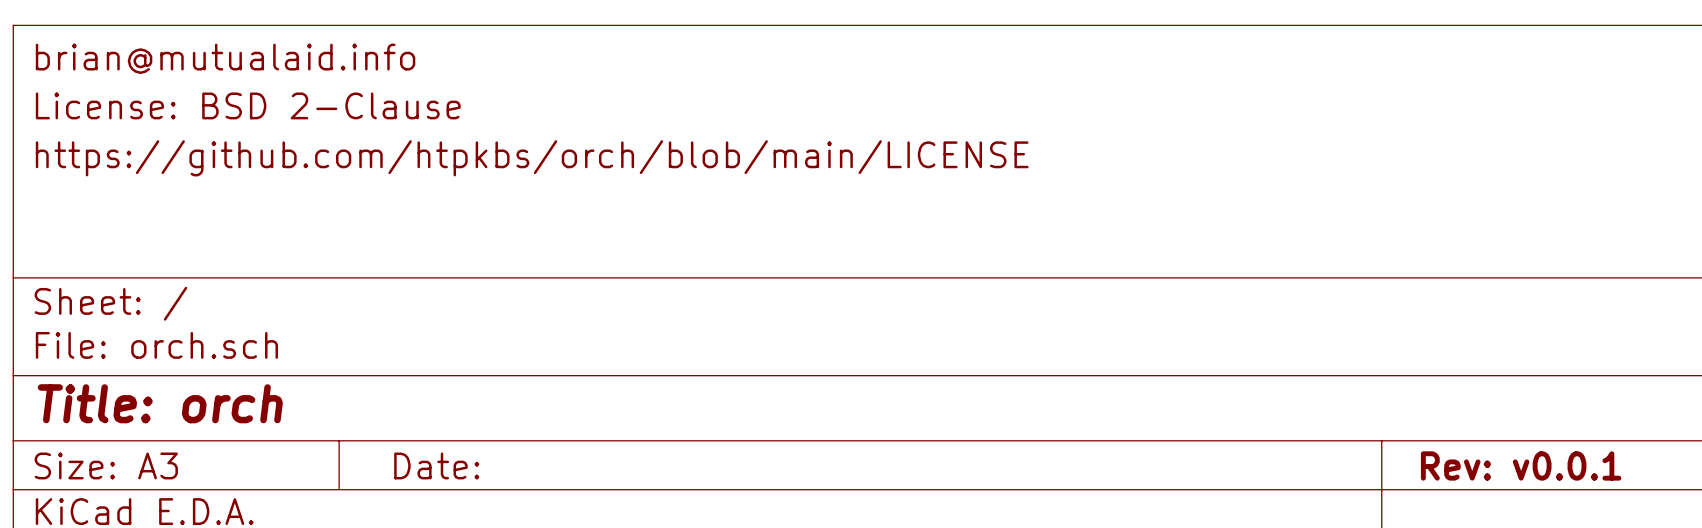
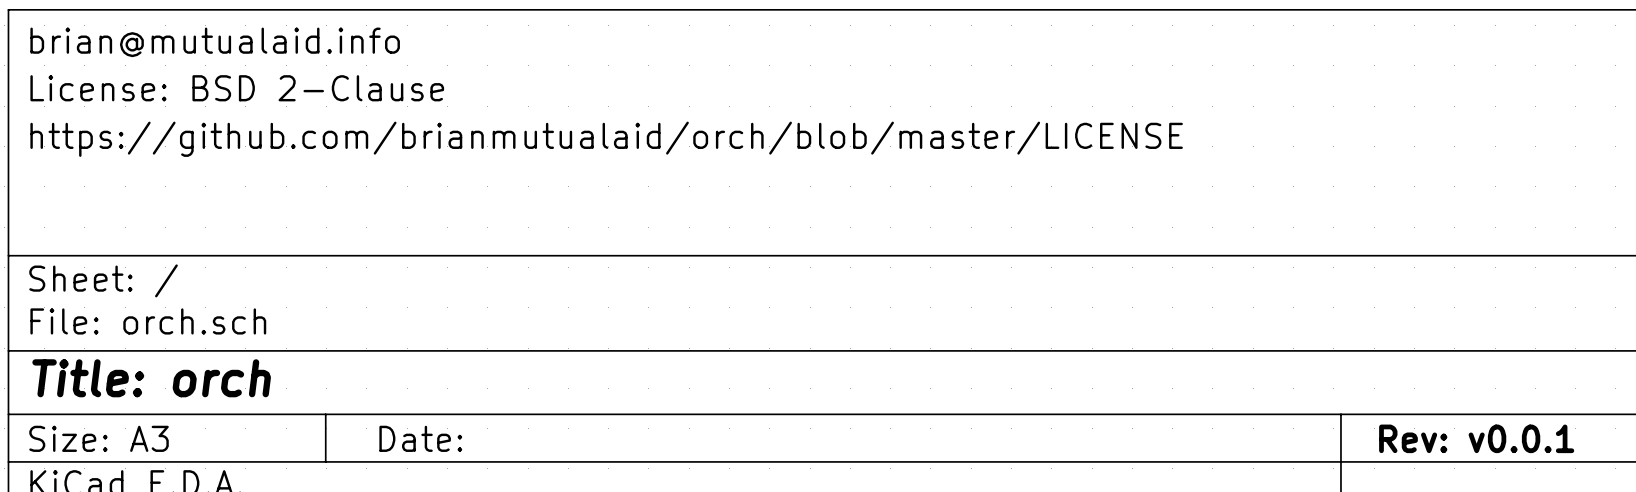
title block: https://github.com/htpkbs/orch/blob/main/LICENSE (532, 158) -> https://github.com/brianmutualaid/orch/blob/master/LICENSE (606, 139)

